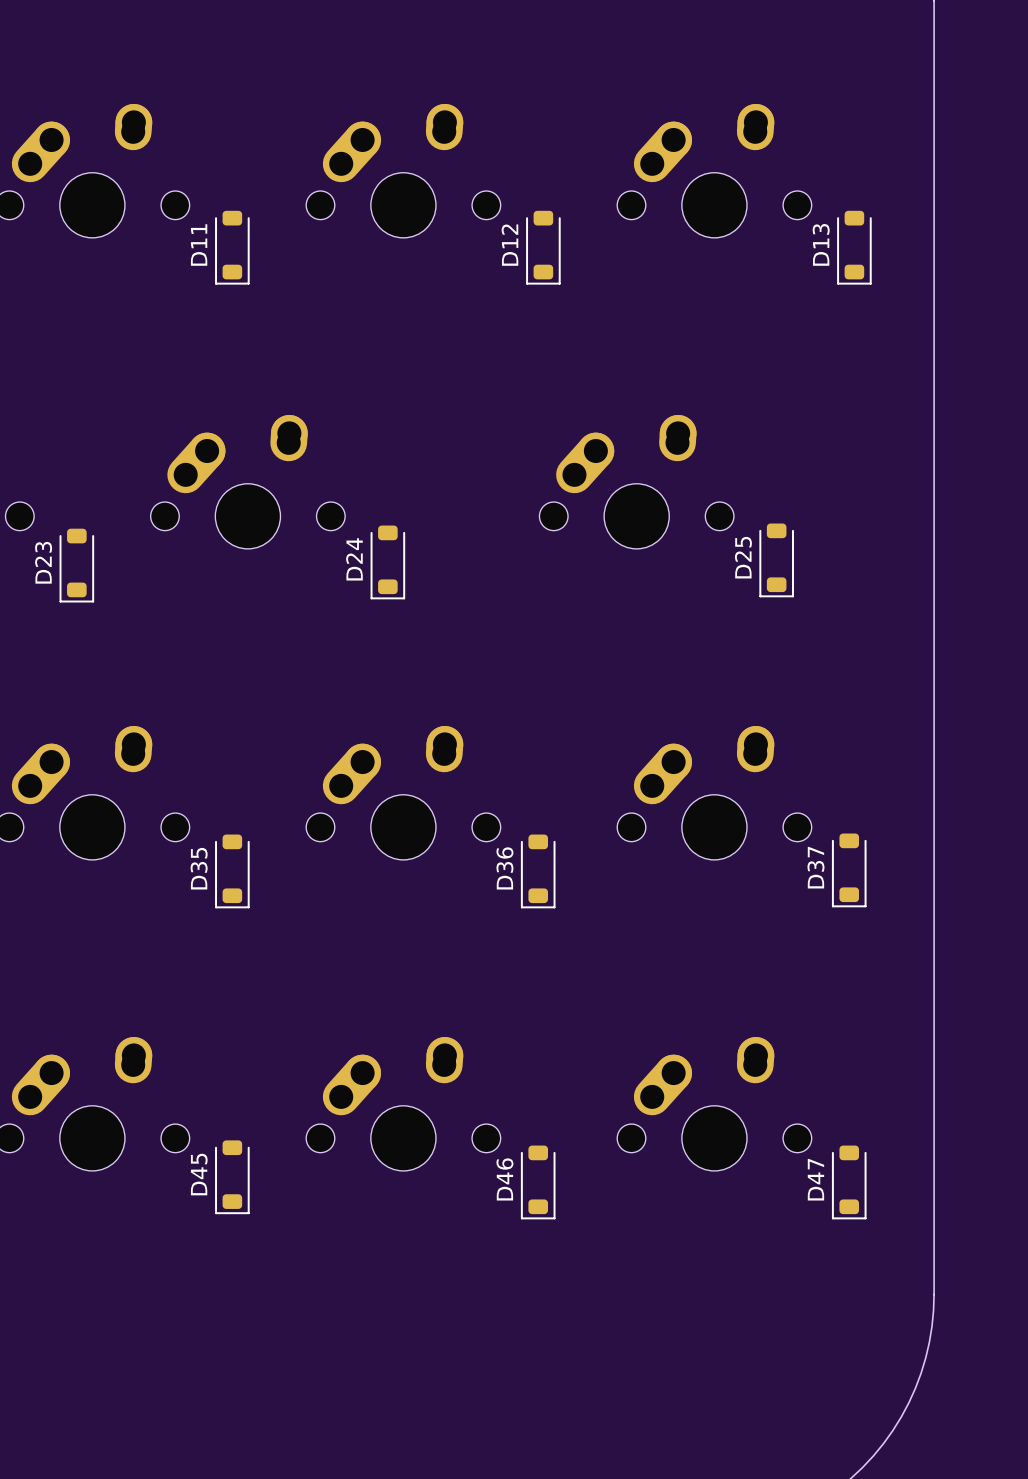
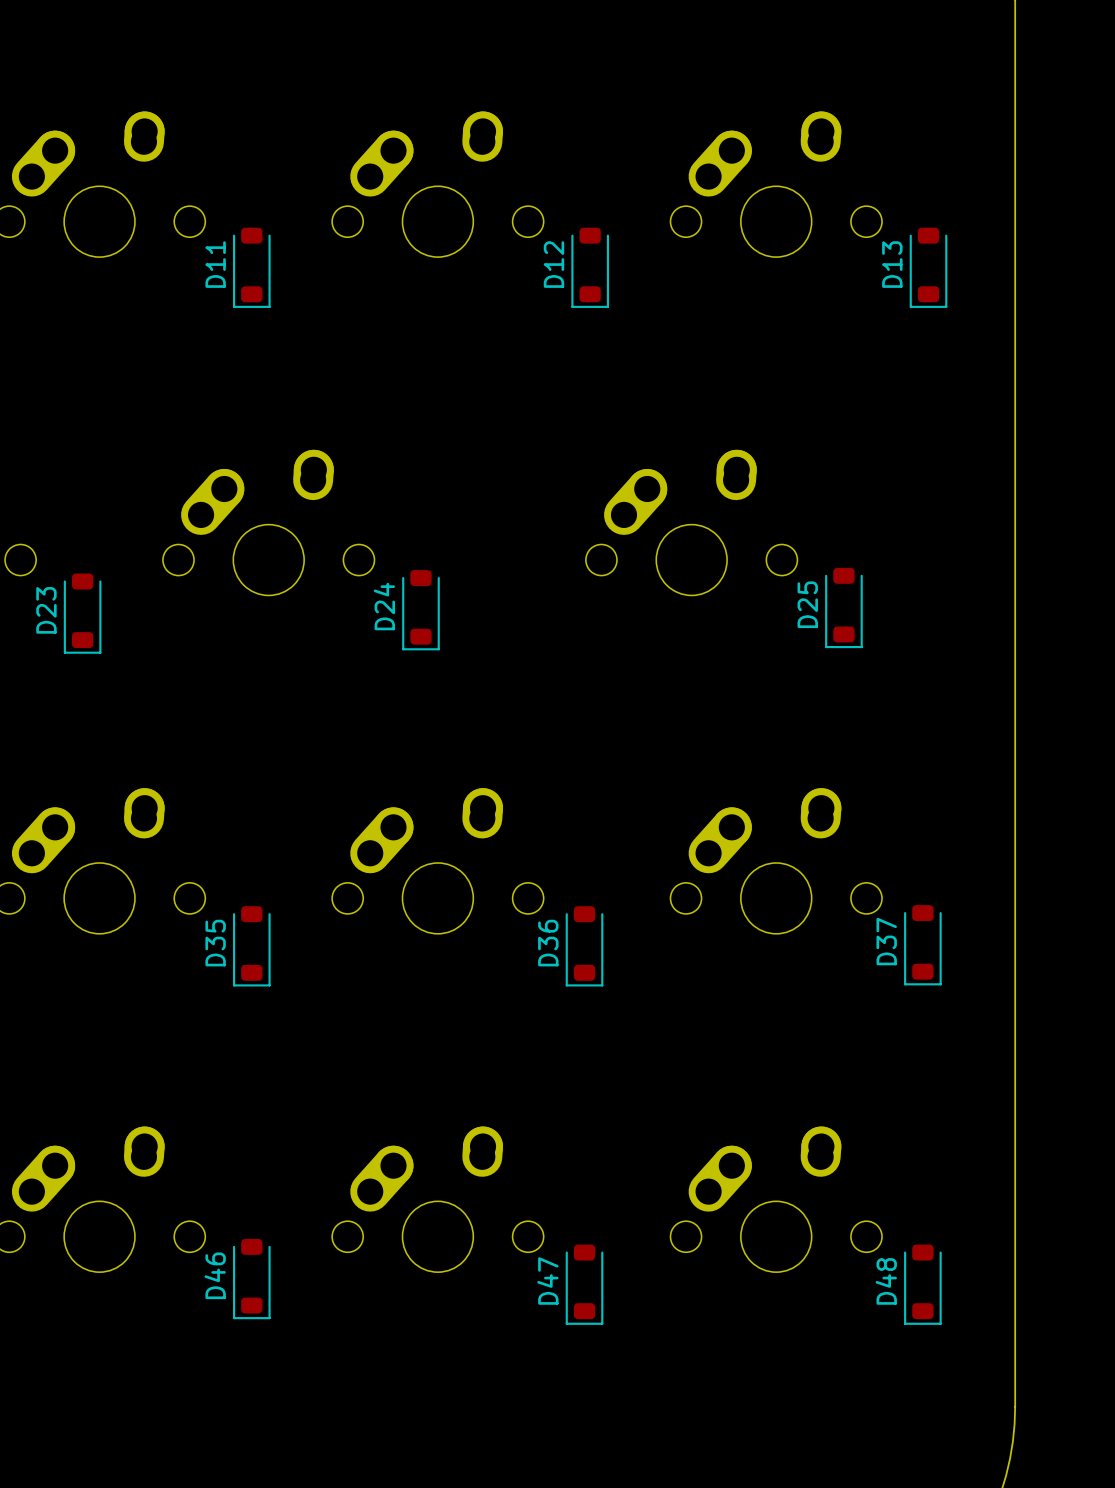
D45 name: D45 (199, 1174) -> D46 (215, 1275)
D46 name: D46 (504, 1179) -> D47 (547, 1281)
D47 name: D47 (815, 1179) -> D48 (886, 1281)

